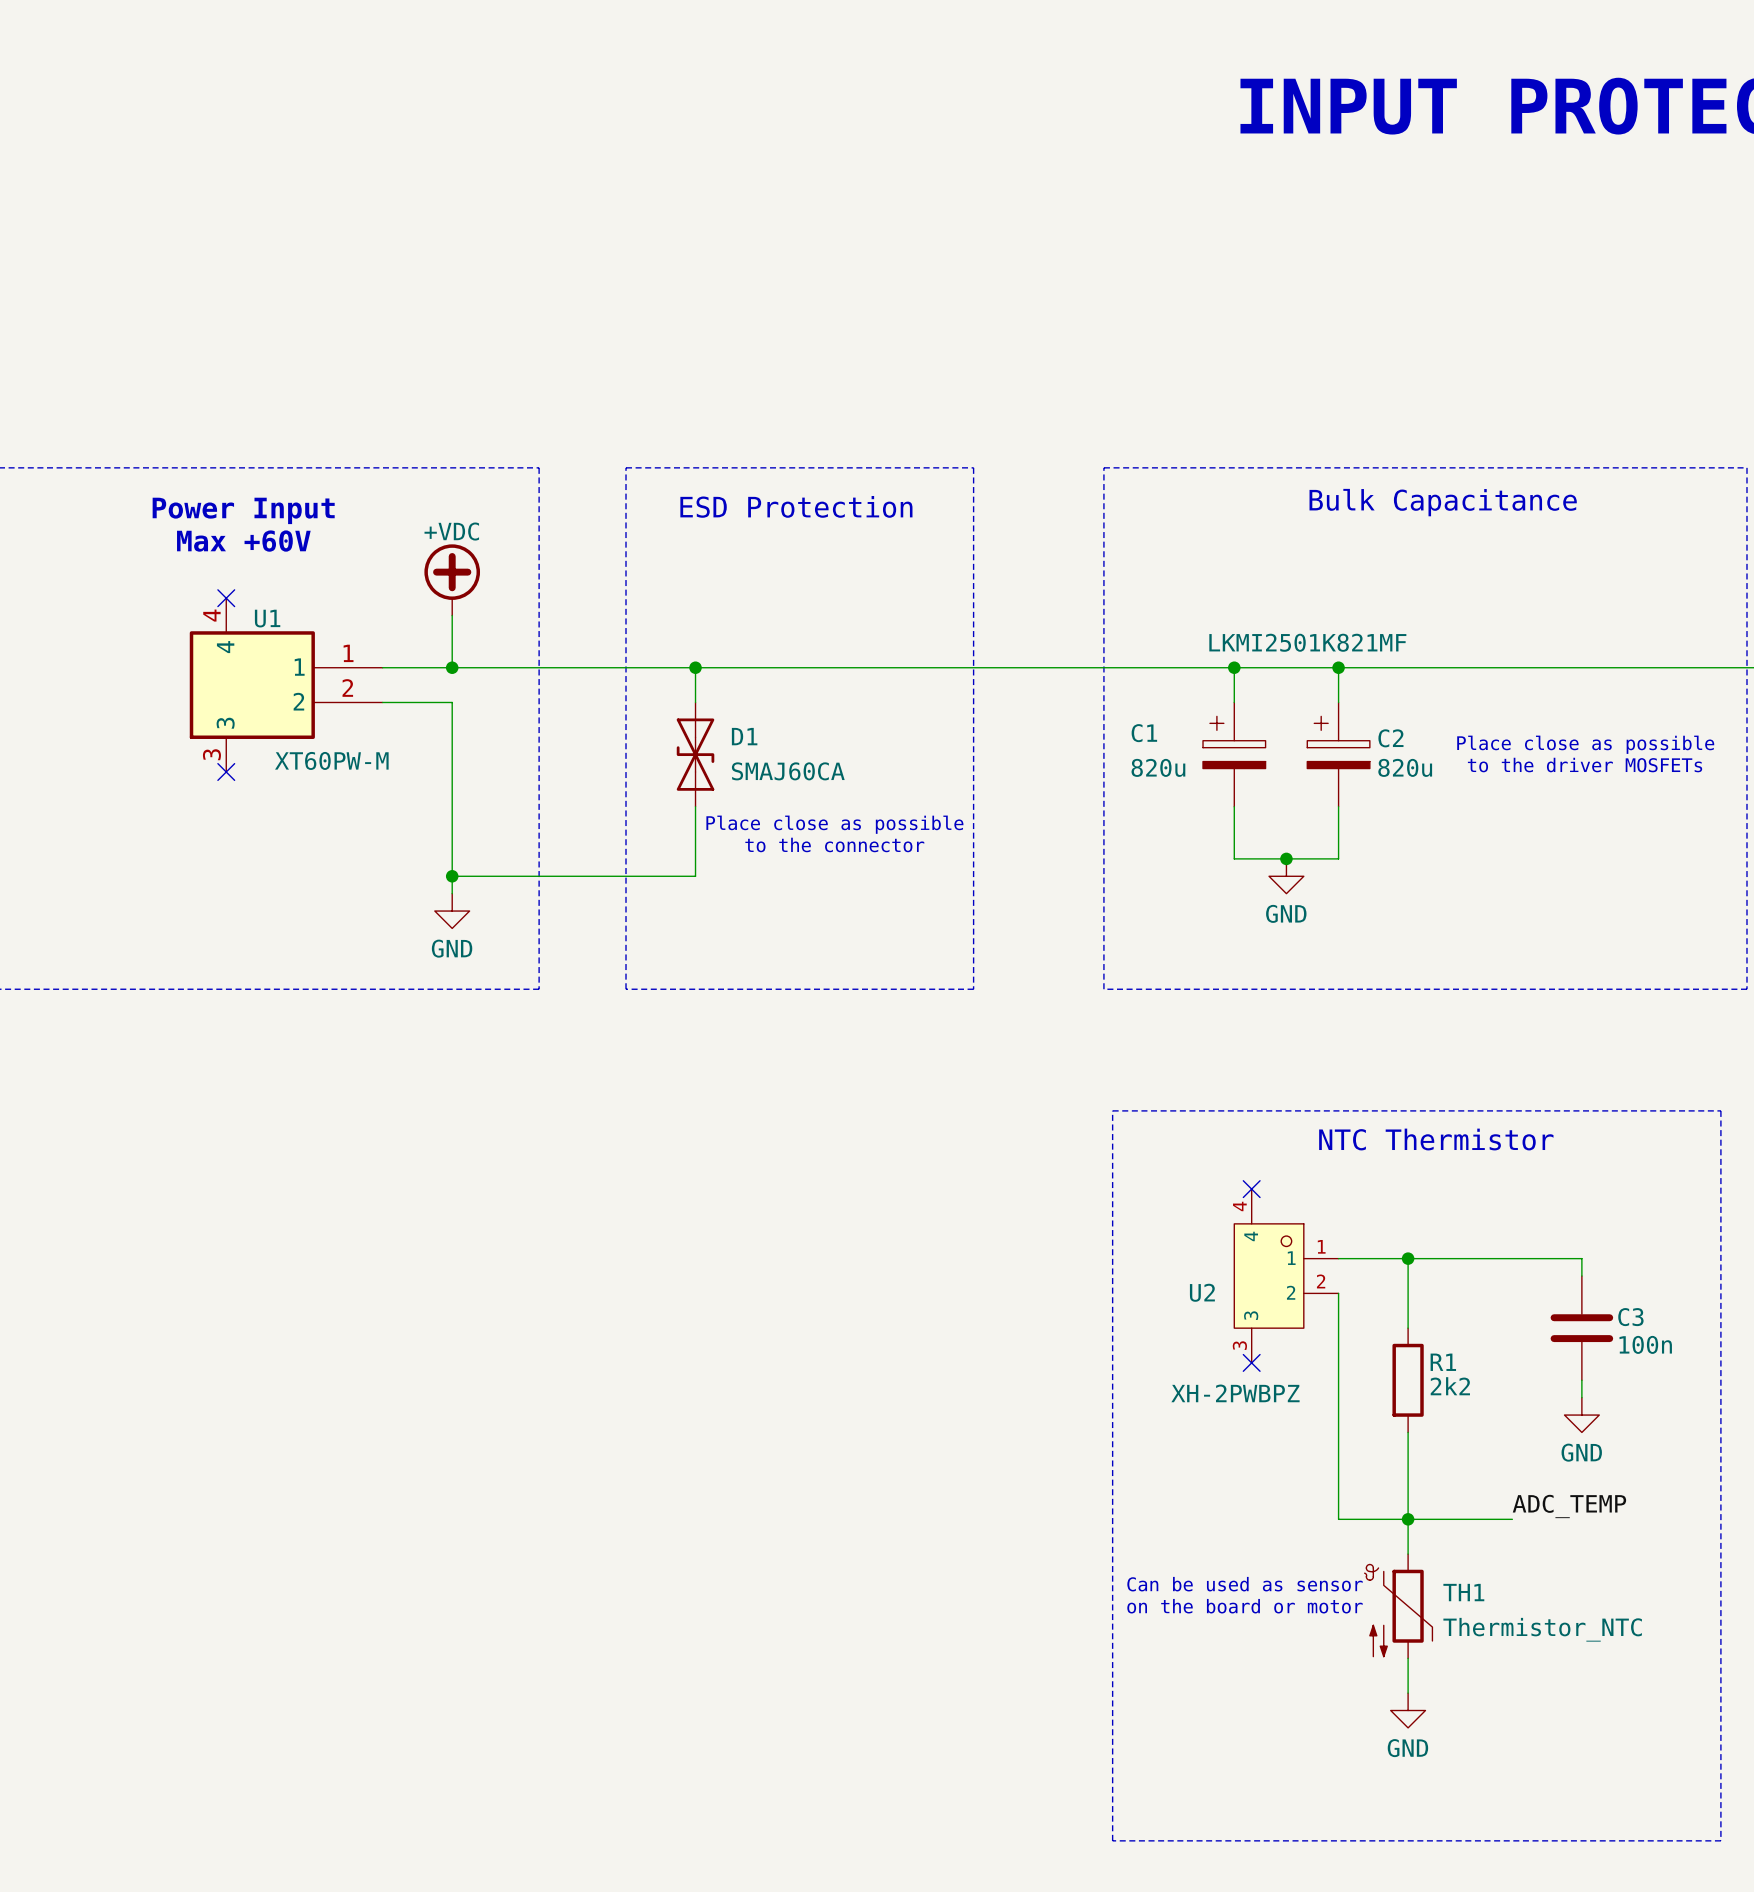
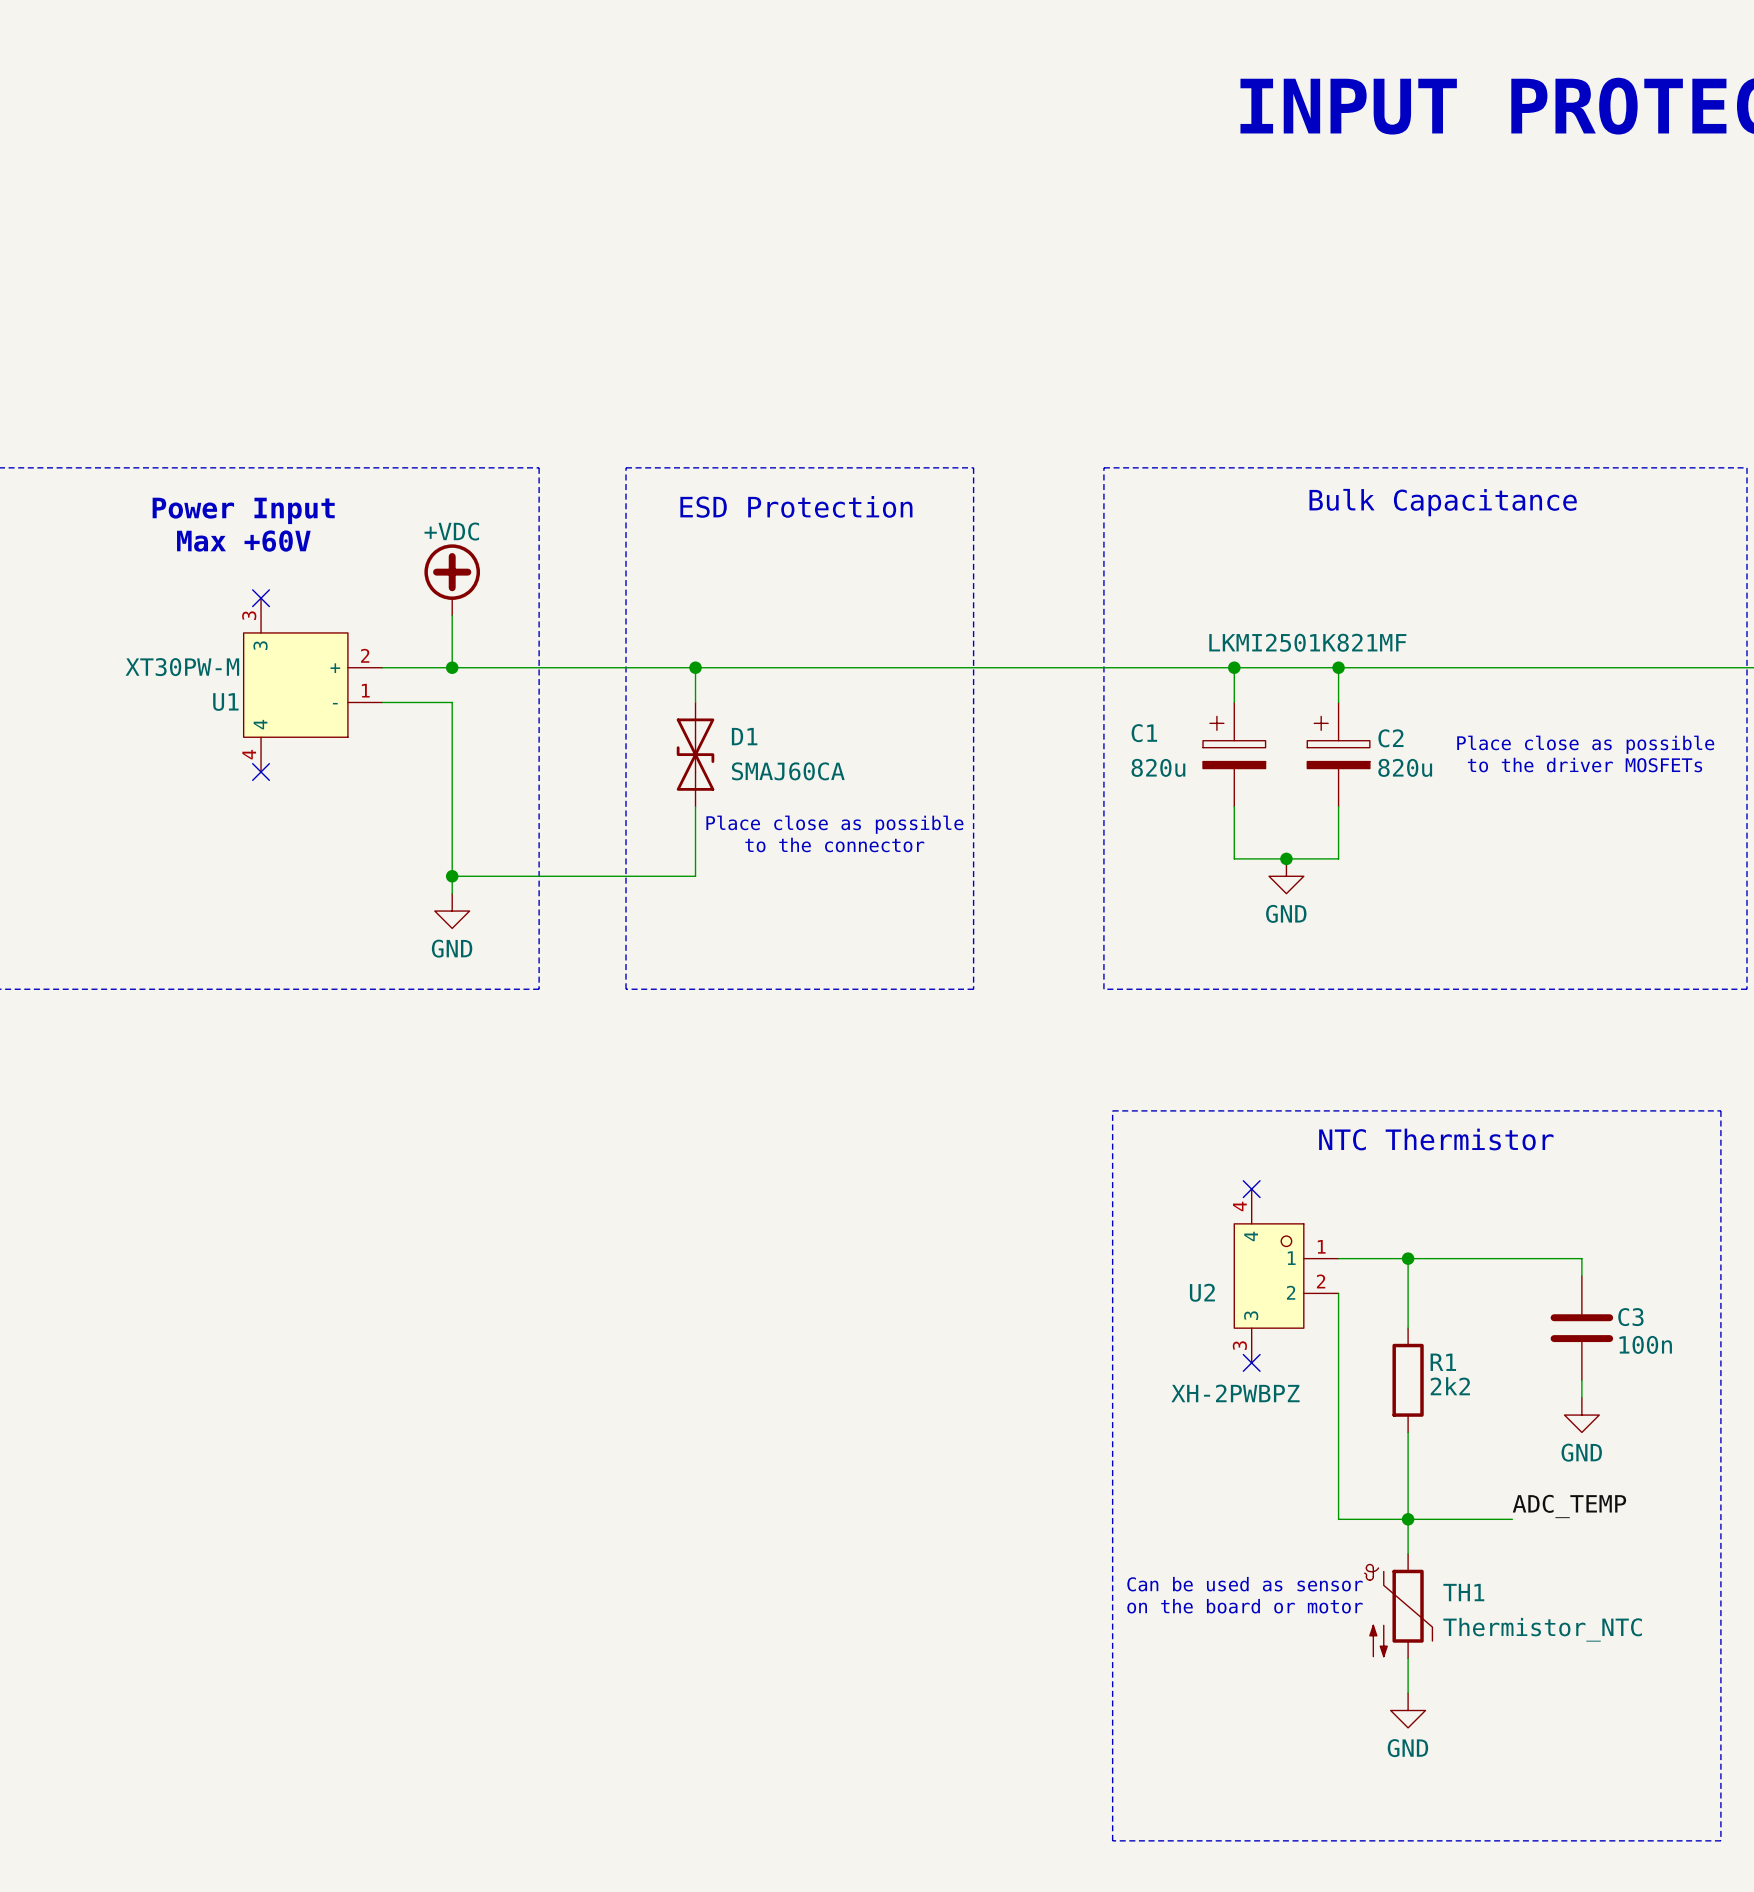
U1 symbol: [189, 598, 383, 773] -> [243, 598, 383, 773]
no-connect mark position: (226, 598) -> (261, 598)
U1 name position: U1 (267, 618) -> U1 (225, 702)
U1 value: XT60PW-M (331, 760) -> XT30PW-M (182, 667)
no-connect mark position: (226, 772) -> (261, 772)

